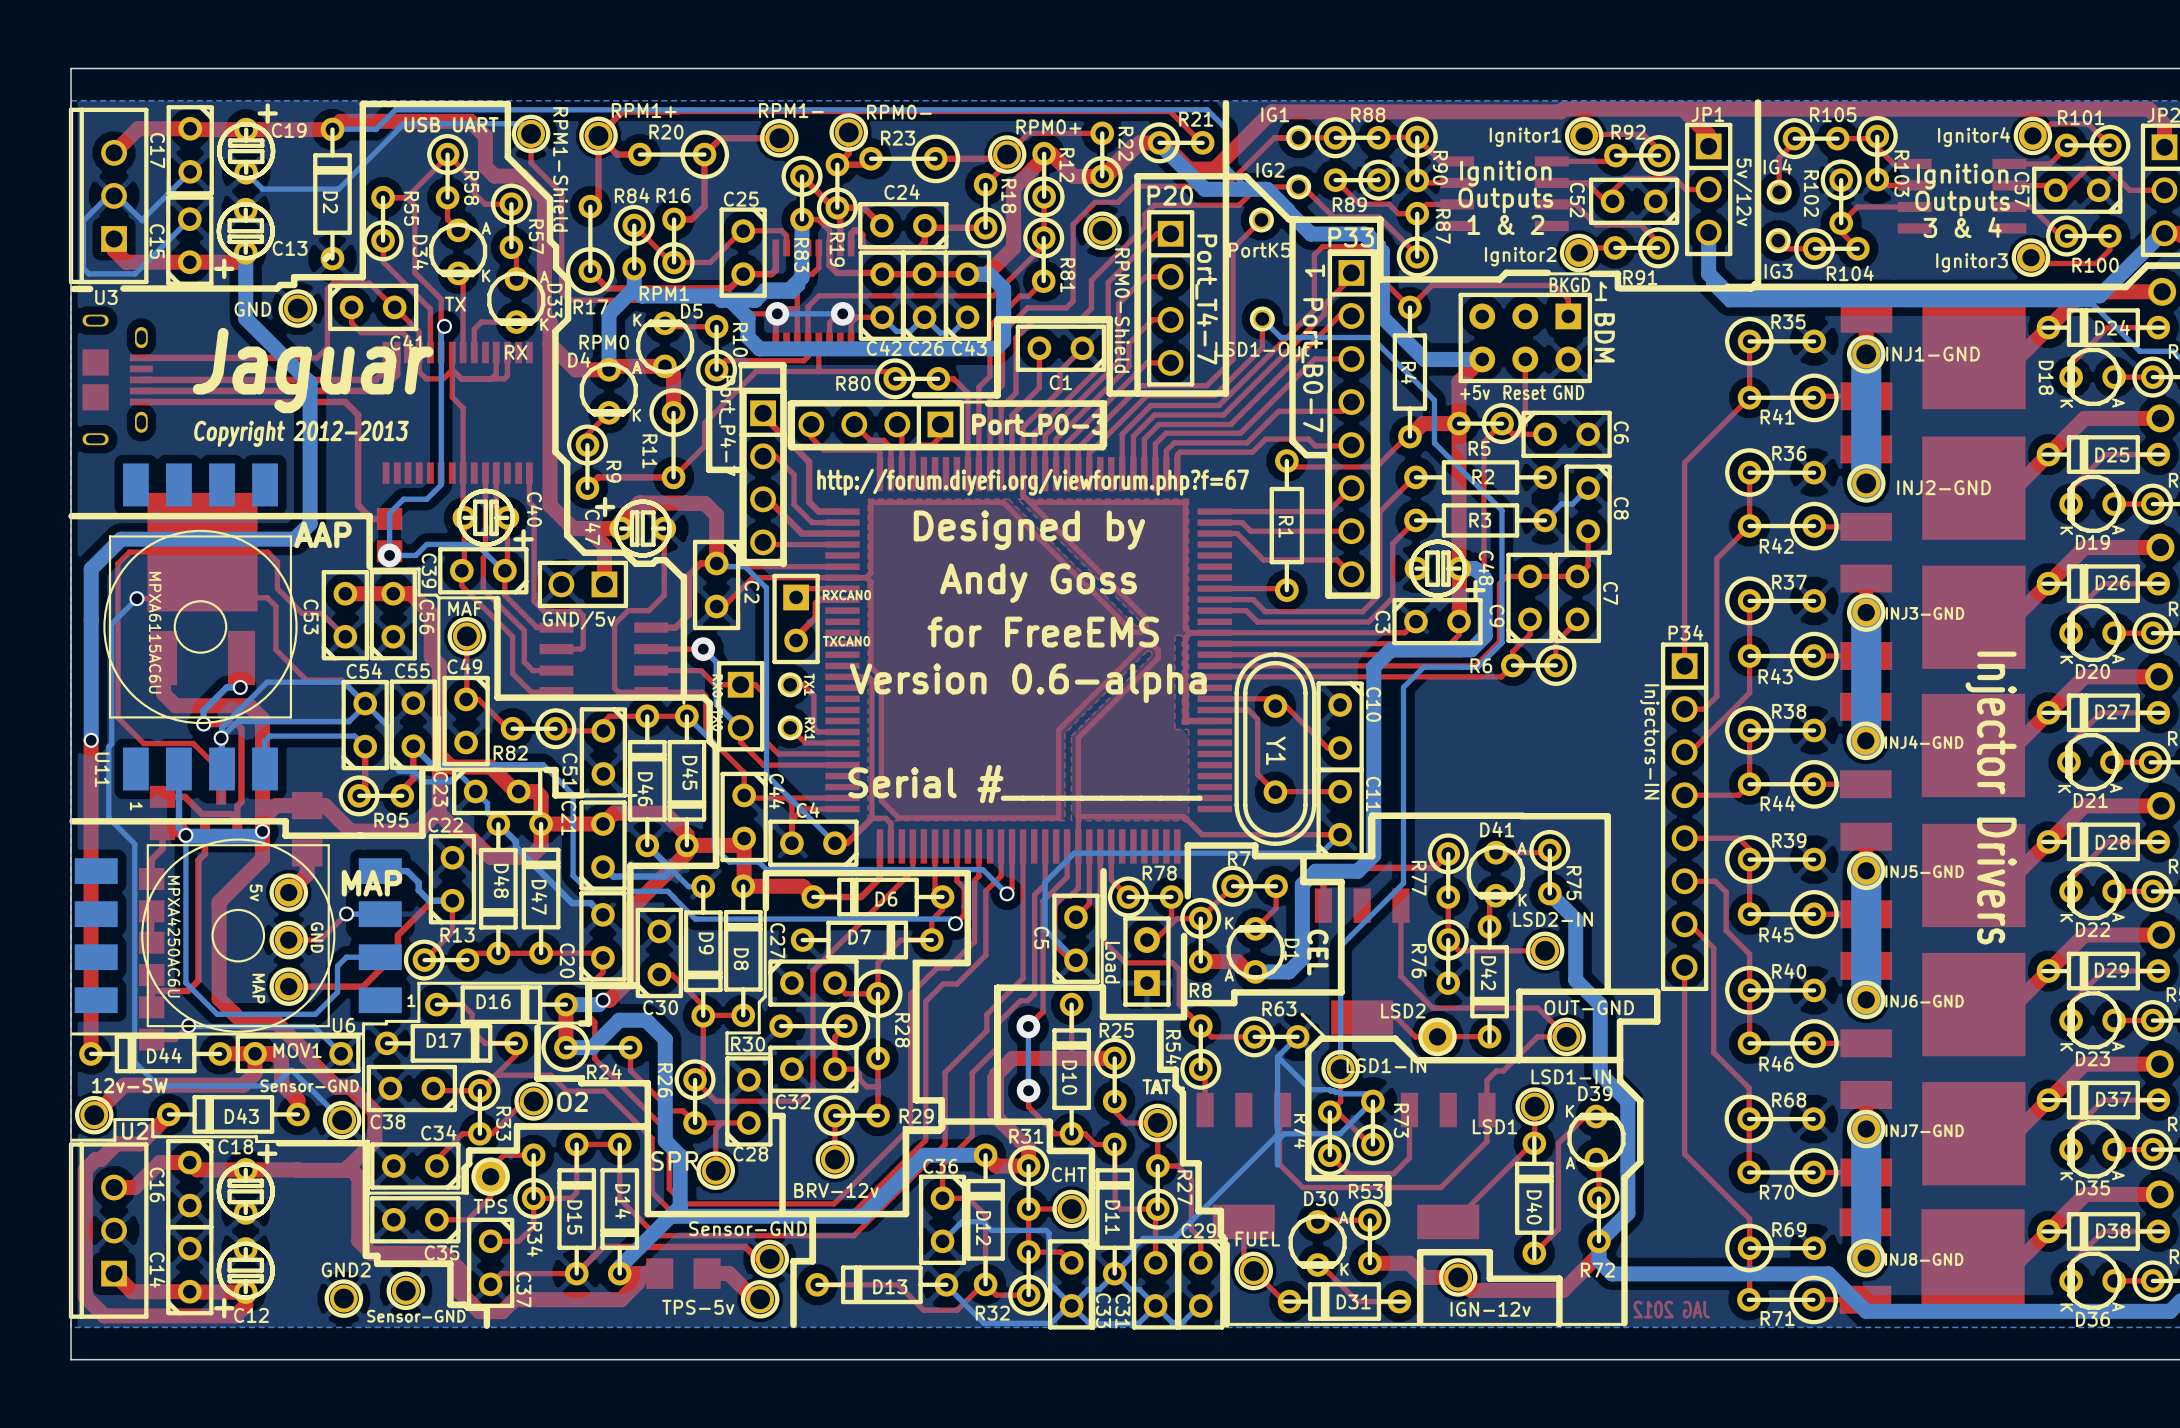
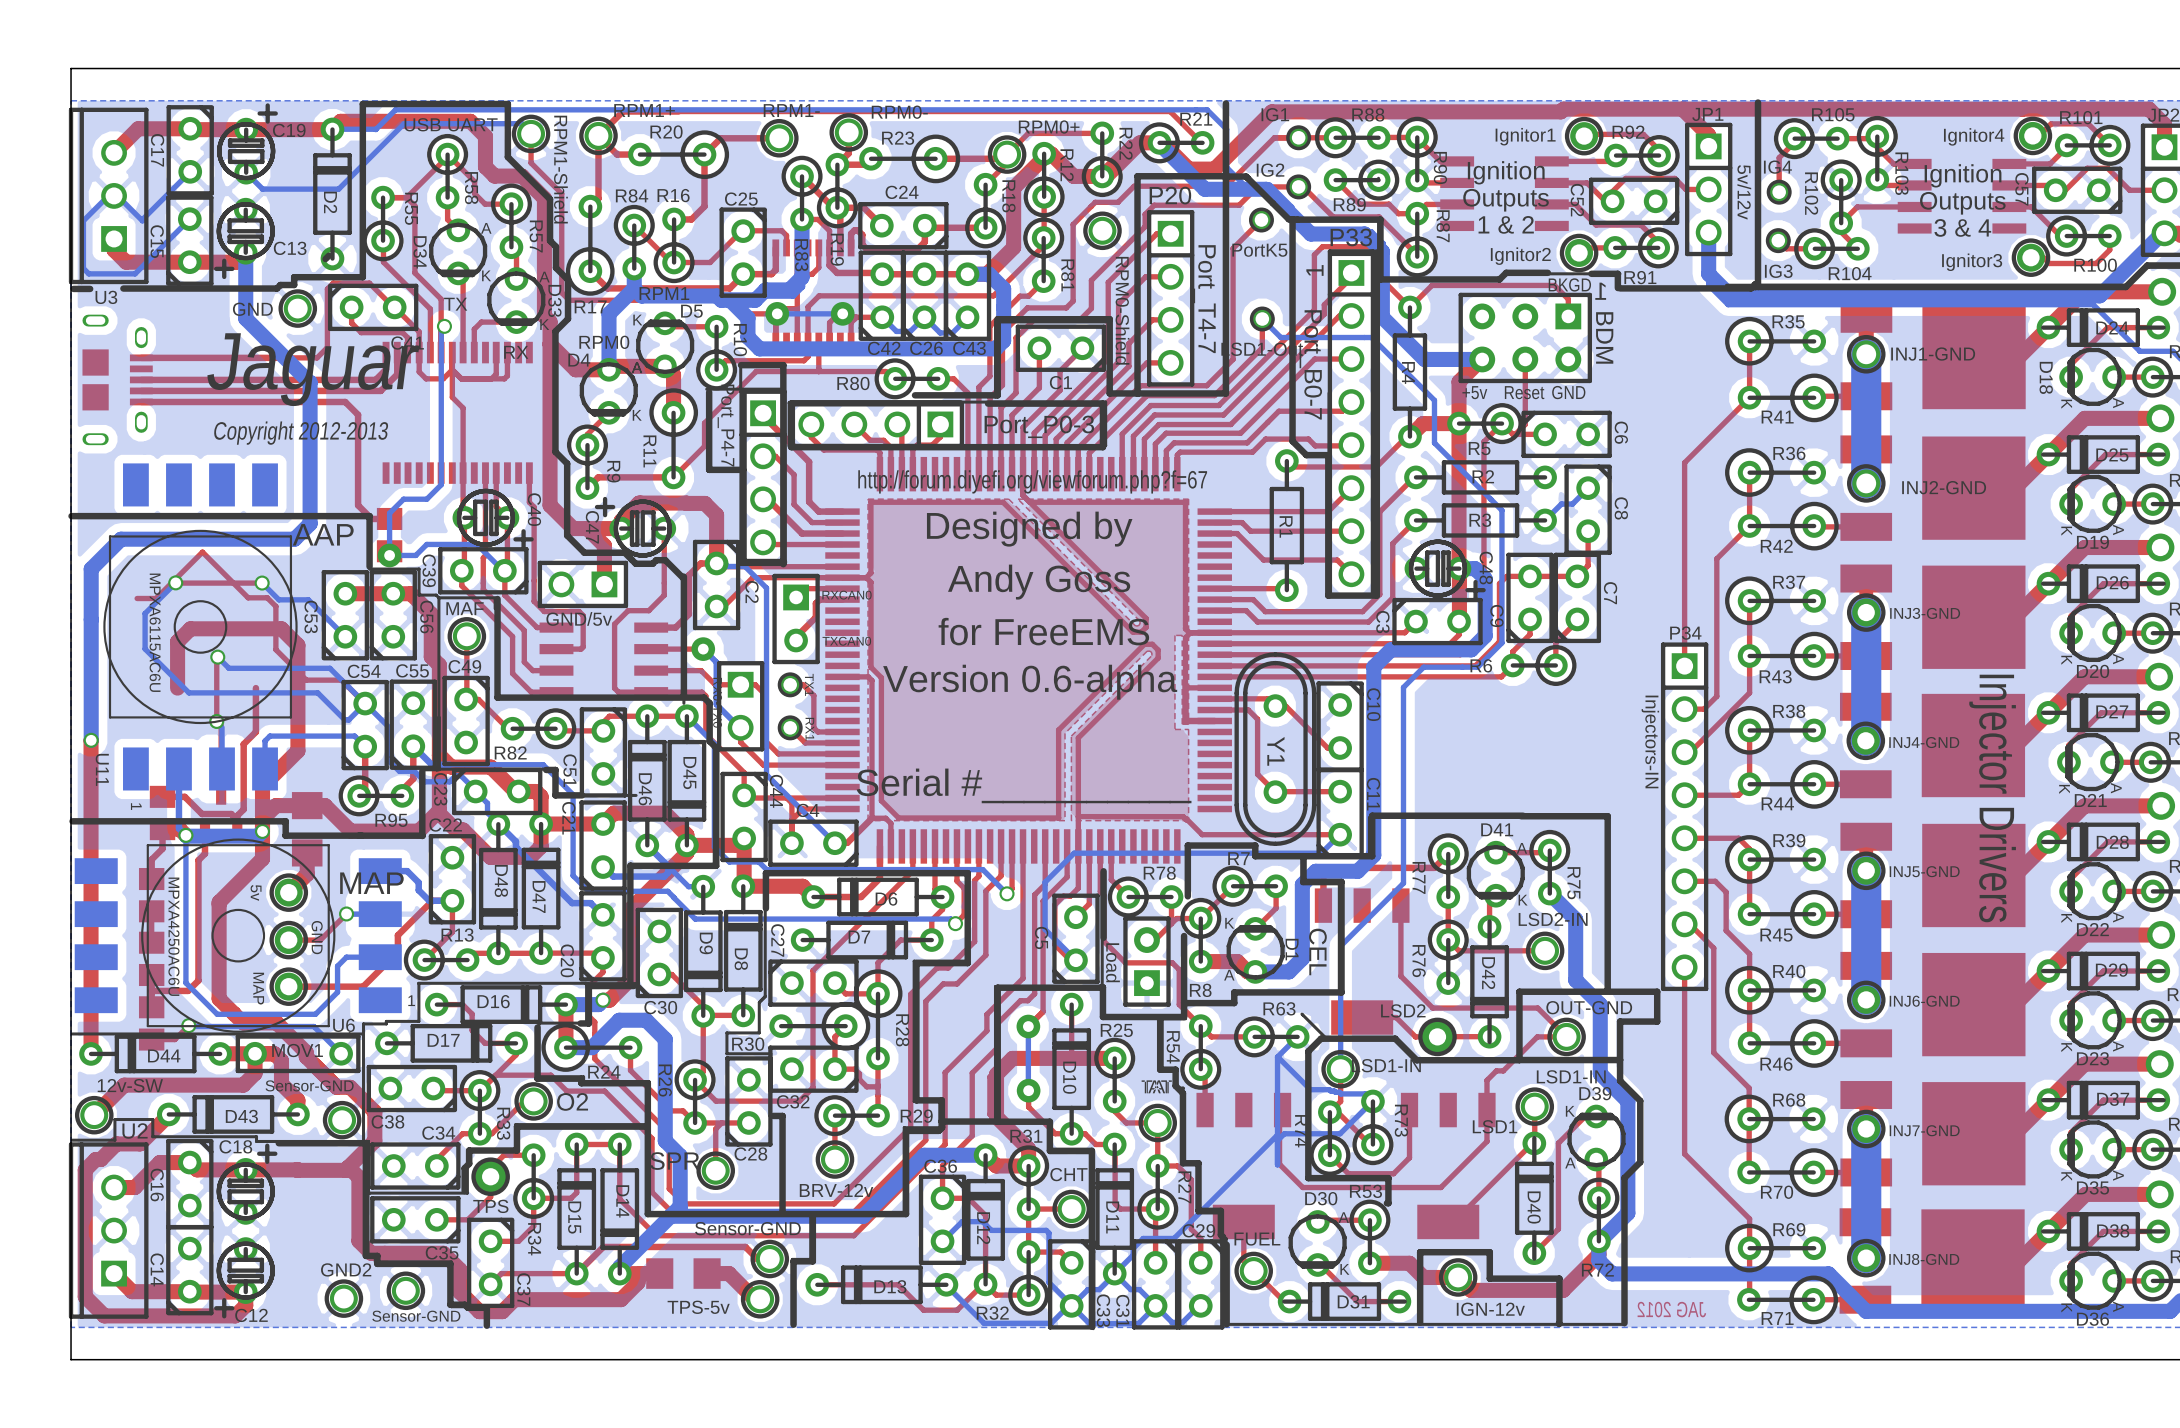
top track: none -> (262, 583) (175, 583)
bottom track: none -> (262, 583) (278, 599) (308, 599) (345, 636)
via: none -> (262, 583)
part: (202, 588) -> none
bottom track: (136, 598) (111, 623) (111, 744) (108, 746) (108, 818) (134, 844) (134, 1062) (158, 1085) (274, 1085) (292, 1070) (341, 1120) -> none
via position: (136, 598) -> (175, 582)
top track: (345, 636) (321, 613) (302, 613) (277, 588) (277, 561) (267, 552) (129, 552) (117, 563) (117, 717) (143, 743) (193, 743) (221, 771) -> none
top track: none -> (217, 657) (216, 721) (221, 725) (221, 738)
via: none -> (217, 657)
top track: (163, 658) (163, 693) (175, 705) (249, 705) (262, 718) (262, 786) -> (177, 688) (177, 641) (190, 628) (281, 628) (297, 645) (297, 750) (262, 786)
bottom track: (343, 682) (267, 682) (222, 727) -> (343, 682) (329, 668) (228, 668) (217, 657)
bottom track: (240, 687) (226, 687) (203, 710) (203, 723) -> none
via: (240, 687) -> none
bottom track: (365, 703) (349, 721) (237, 721) (222, 738) -> (365, 703) (348, 719) (344, 719) (317, 692) (188, 692) (145, 648) (145, 613) (175, 582)
top track: (203, 724) (236, 724) (241, 728) (241, 801) (237, 806) (237, 815) -> (255, 688) (255, 731) (243, 744) (243, 809) (237, 815)
via position: (203, 724) -> (216, 721)
via: (221, 738) -> none

